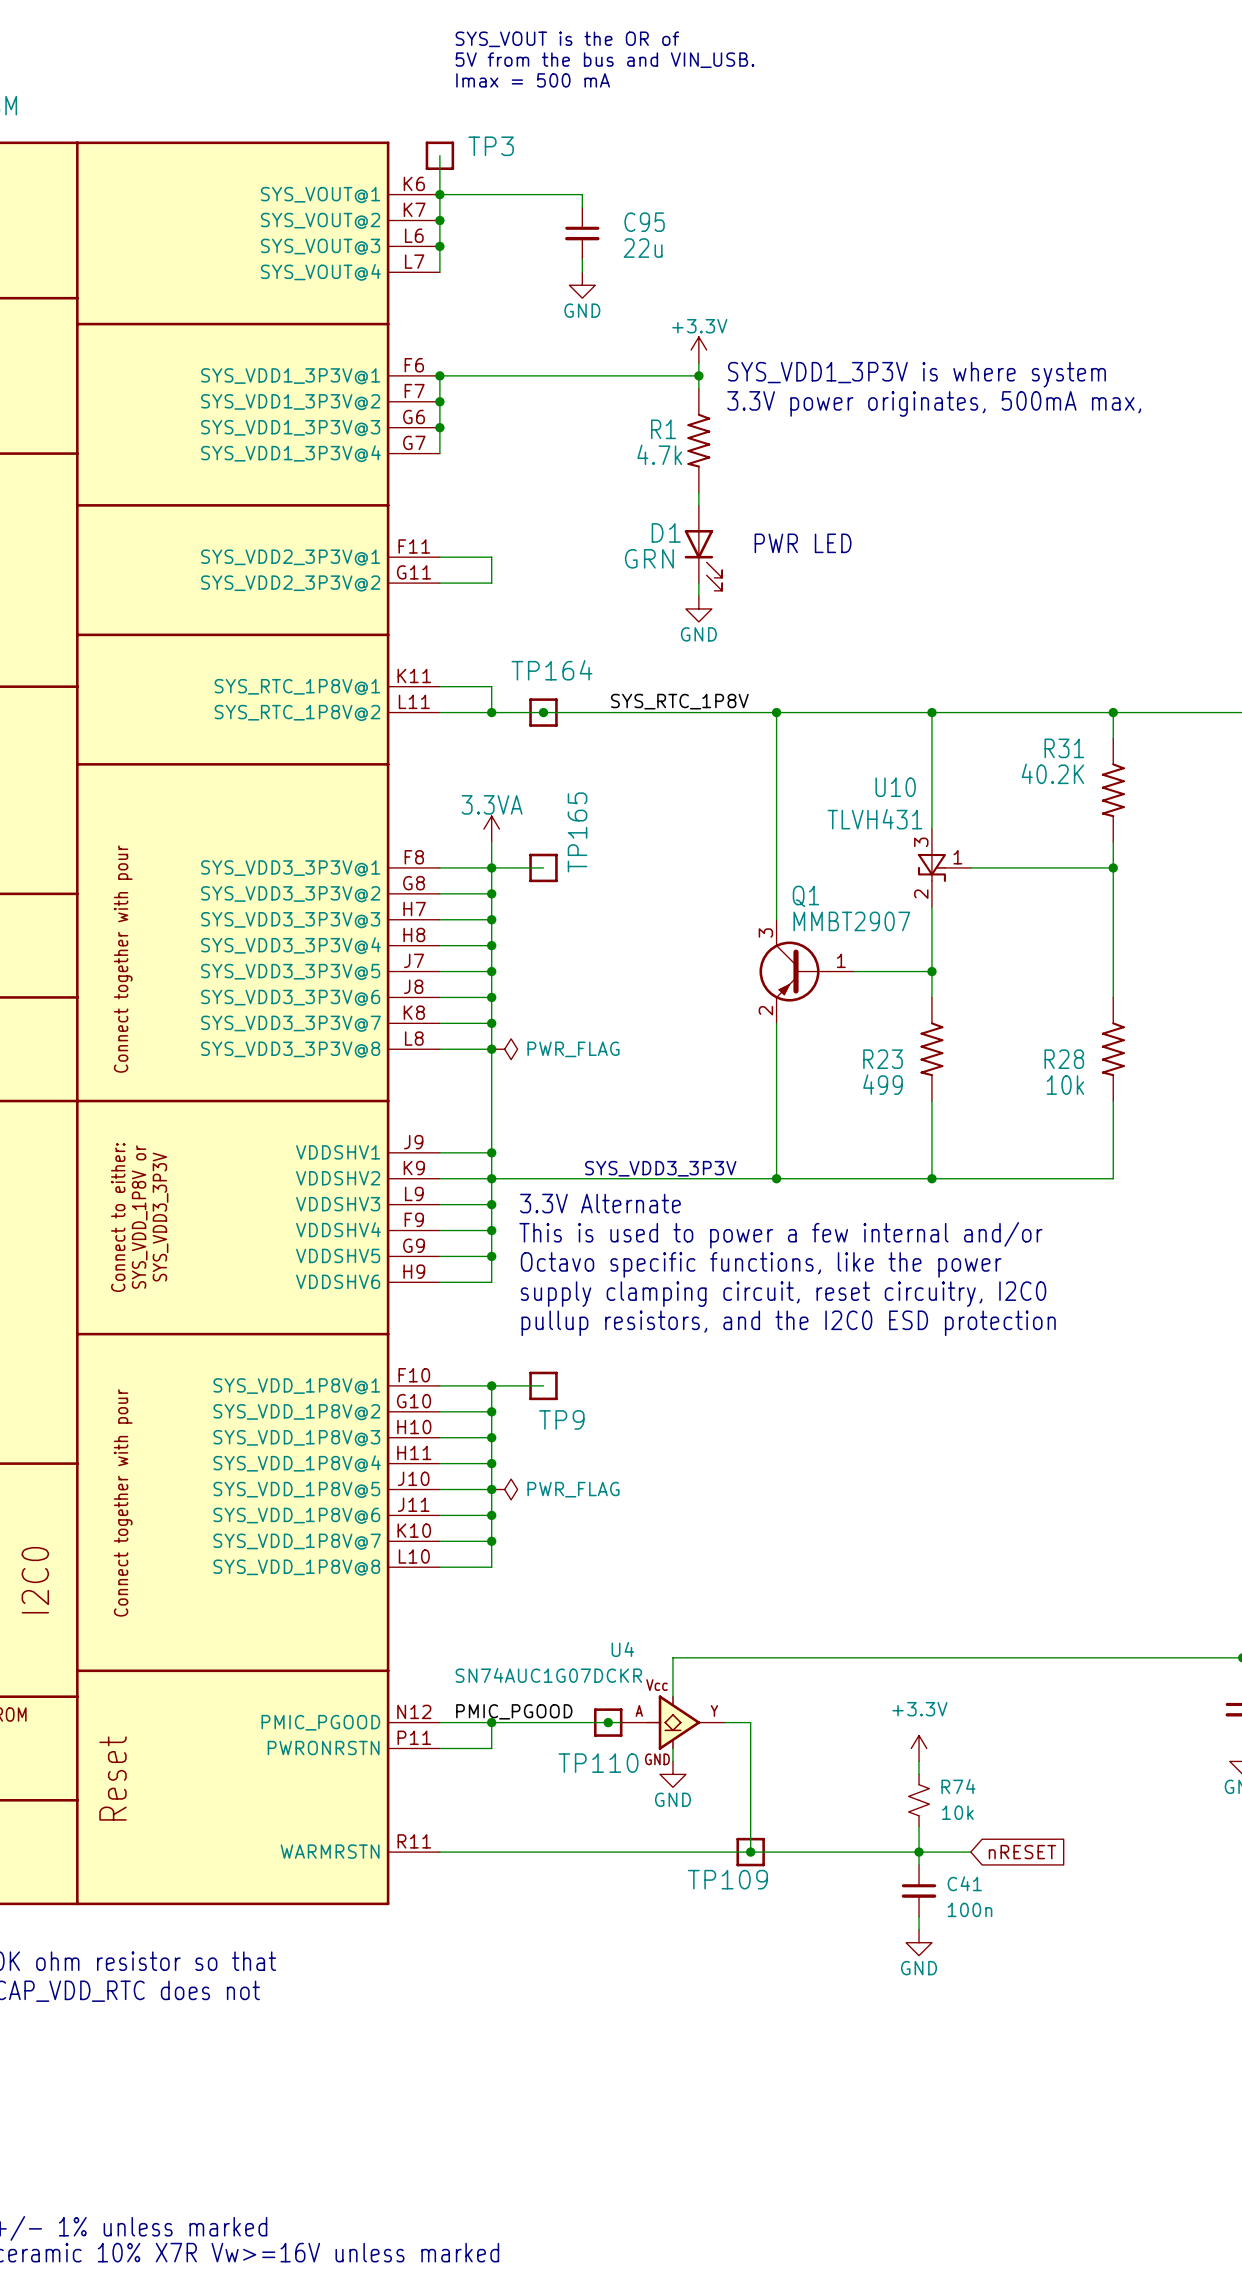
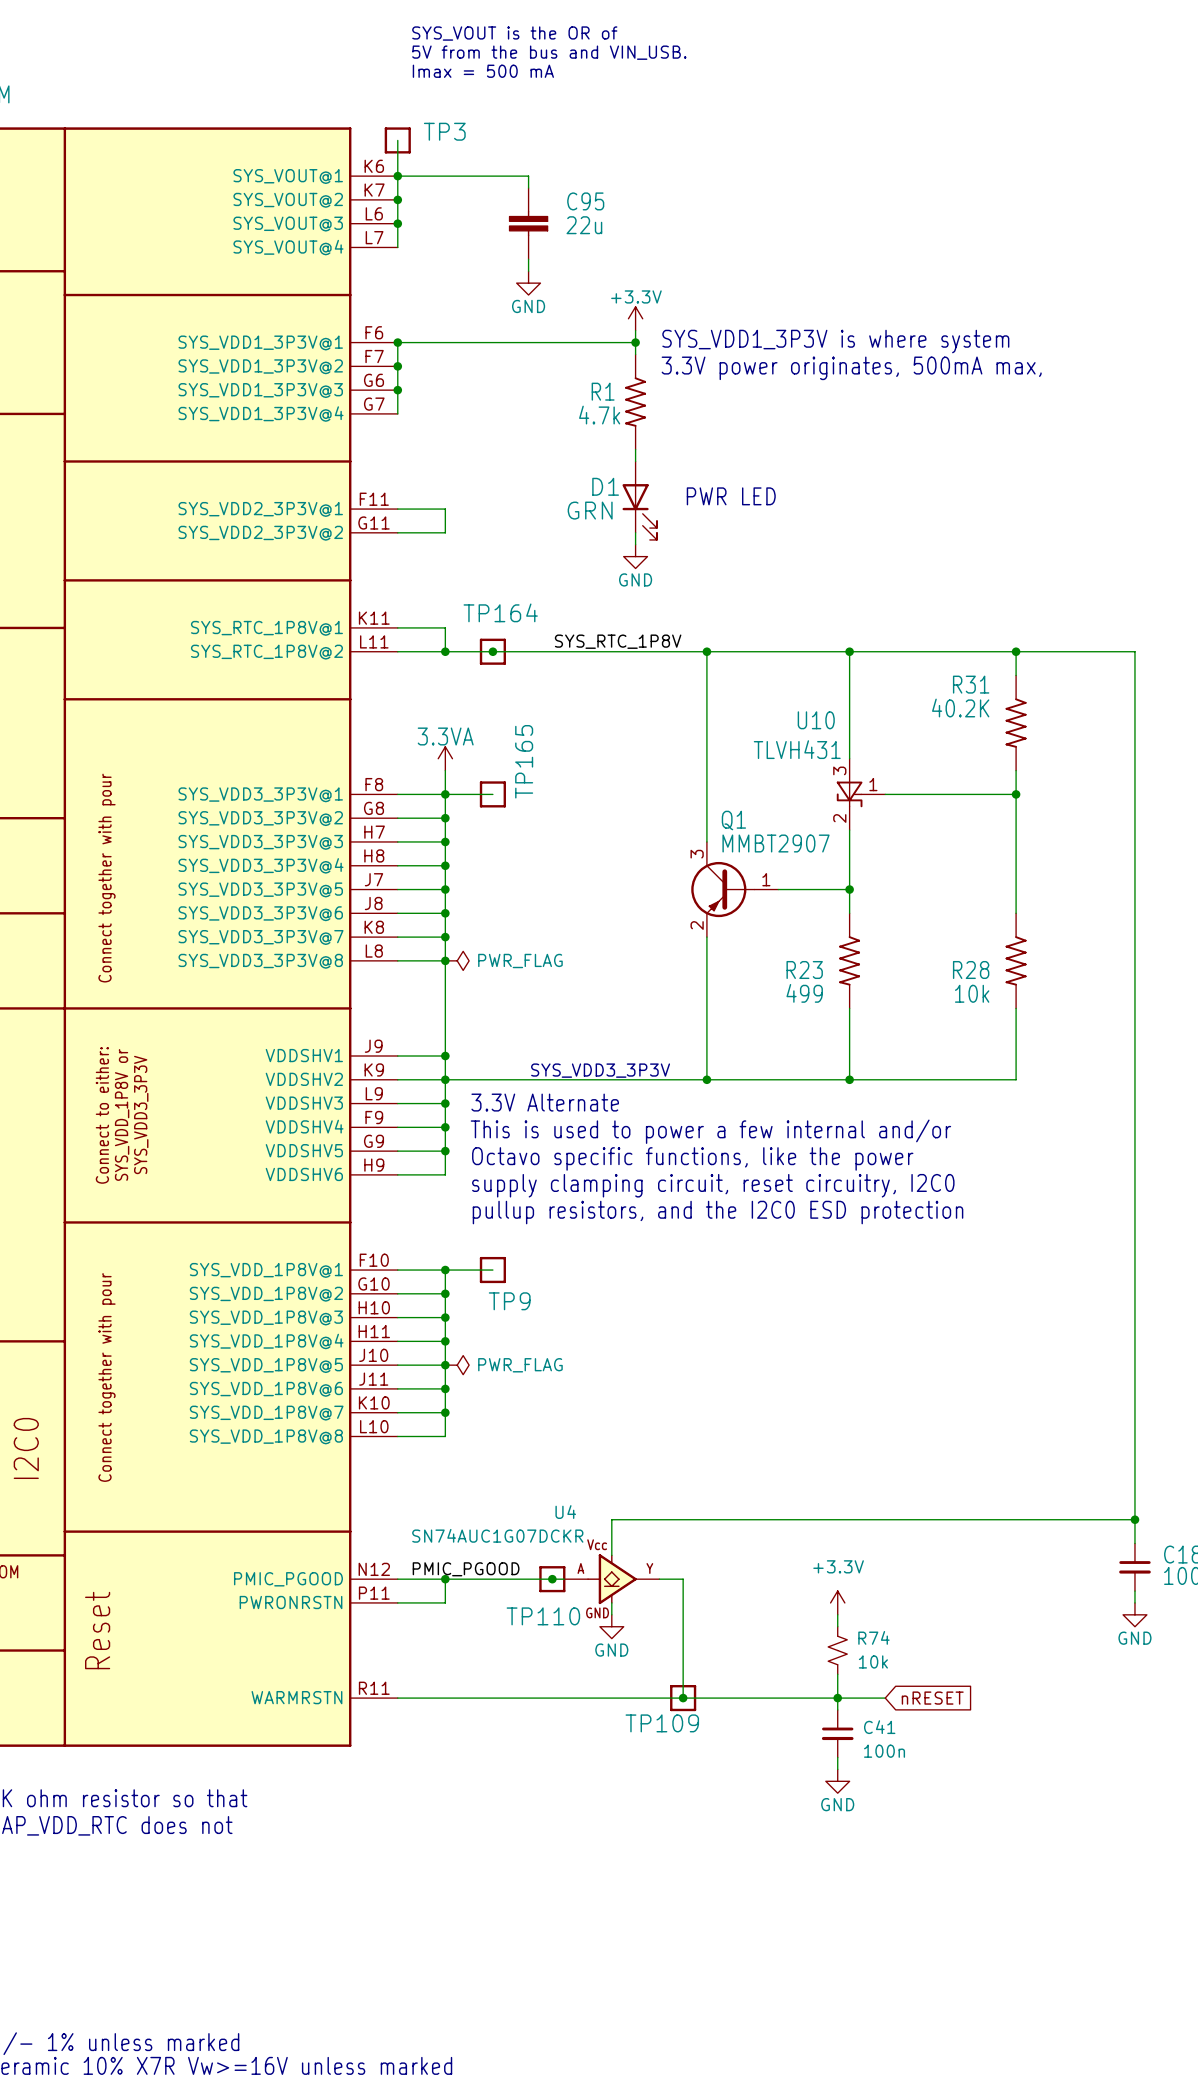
C95 symbol: [565, 207, 600, 260] -> [509, 188, 548, 260]
power symbol position: GND (582, 285) -> GND (528, 283)

